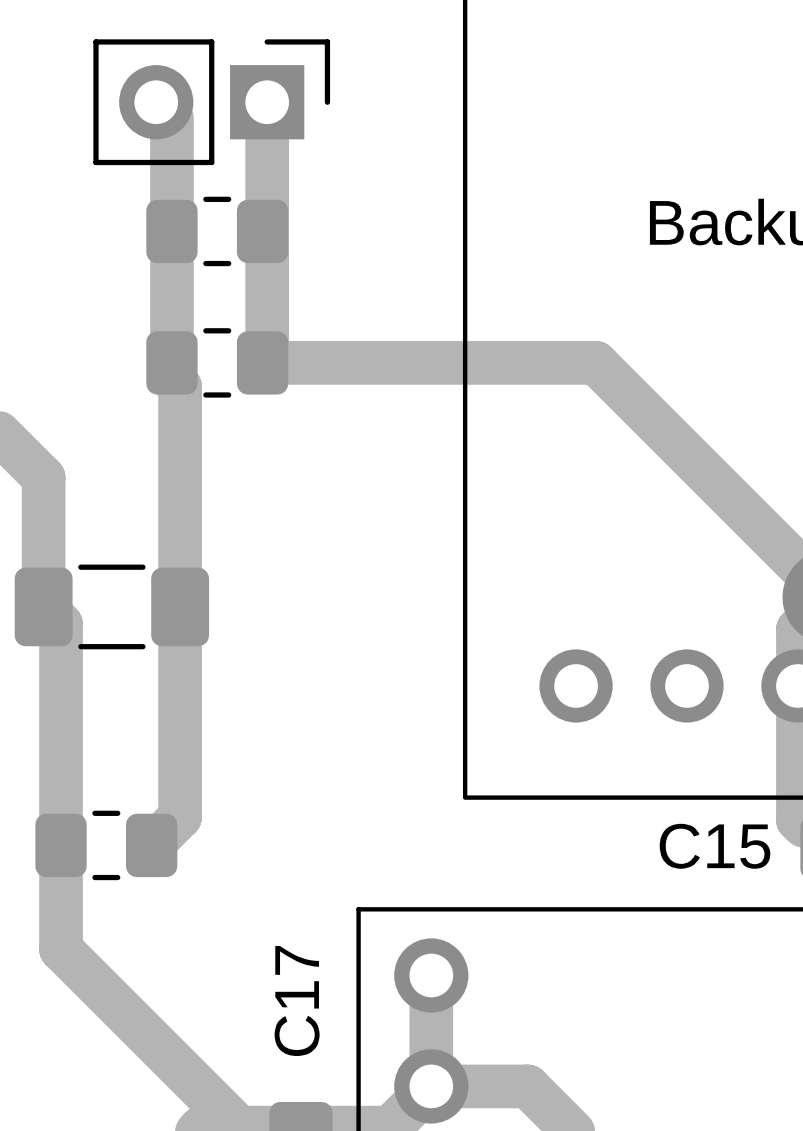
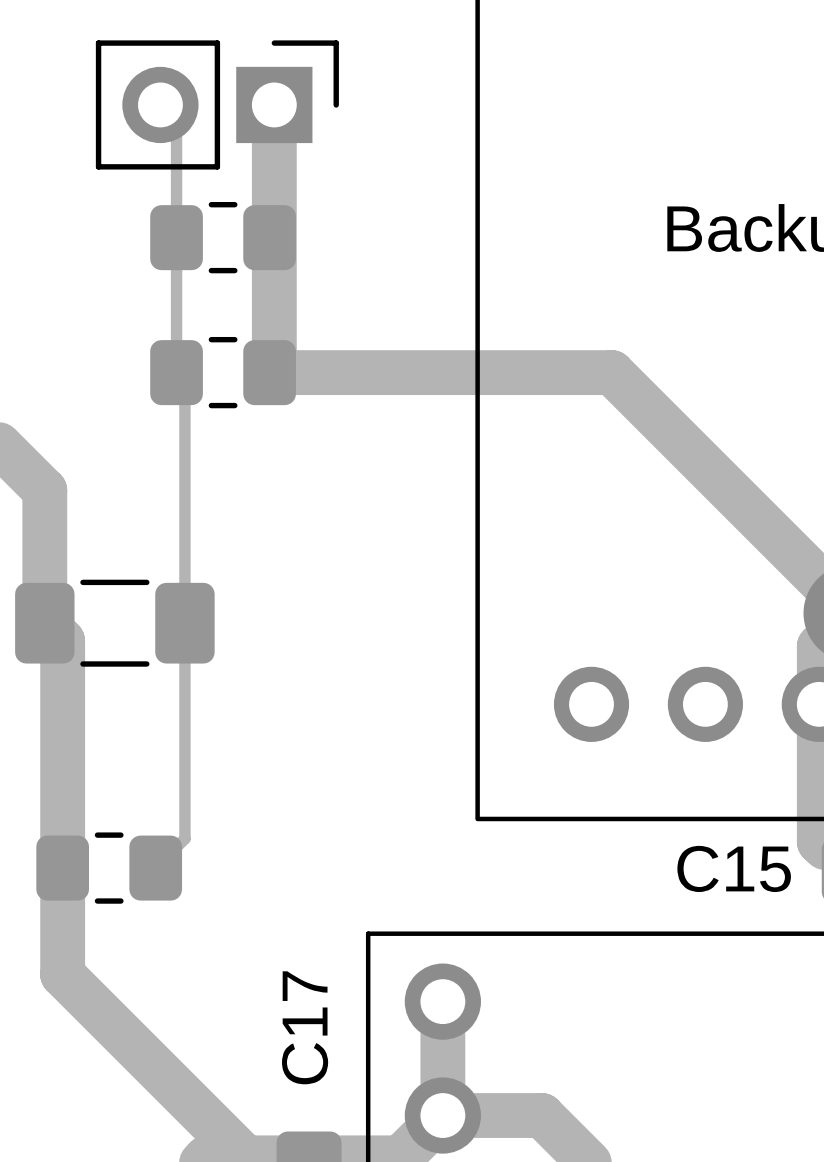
track width: thick (171, 117) (171, 378) (180, 386) (180, 816) (151, 845) -> thin (176, 121) (176, 388) (184, 397) (184, 838) (155, 868)

